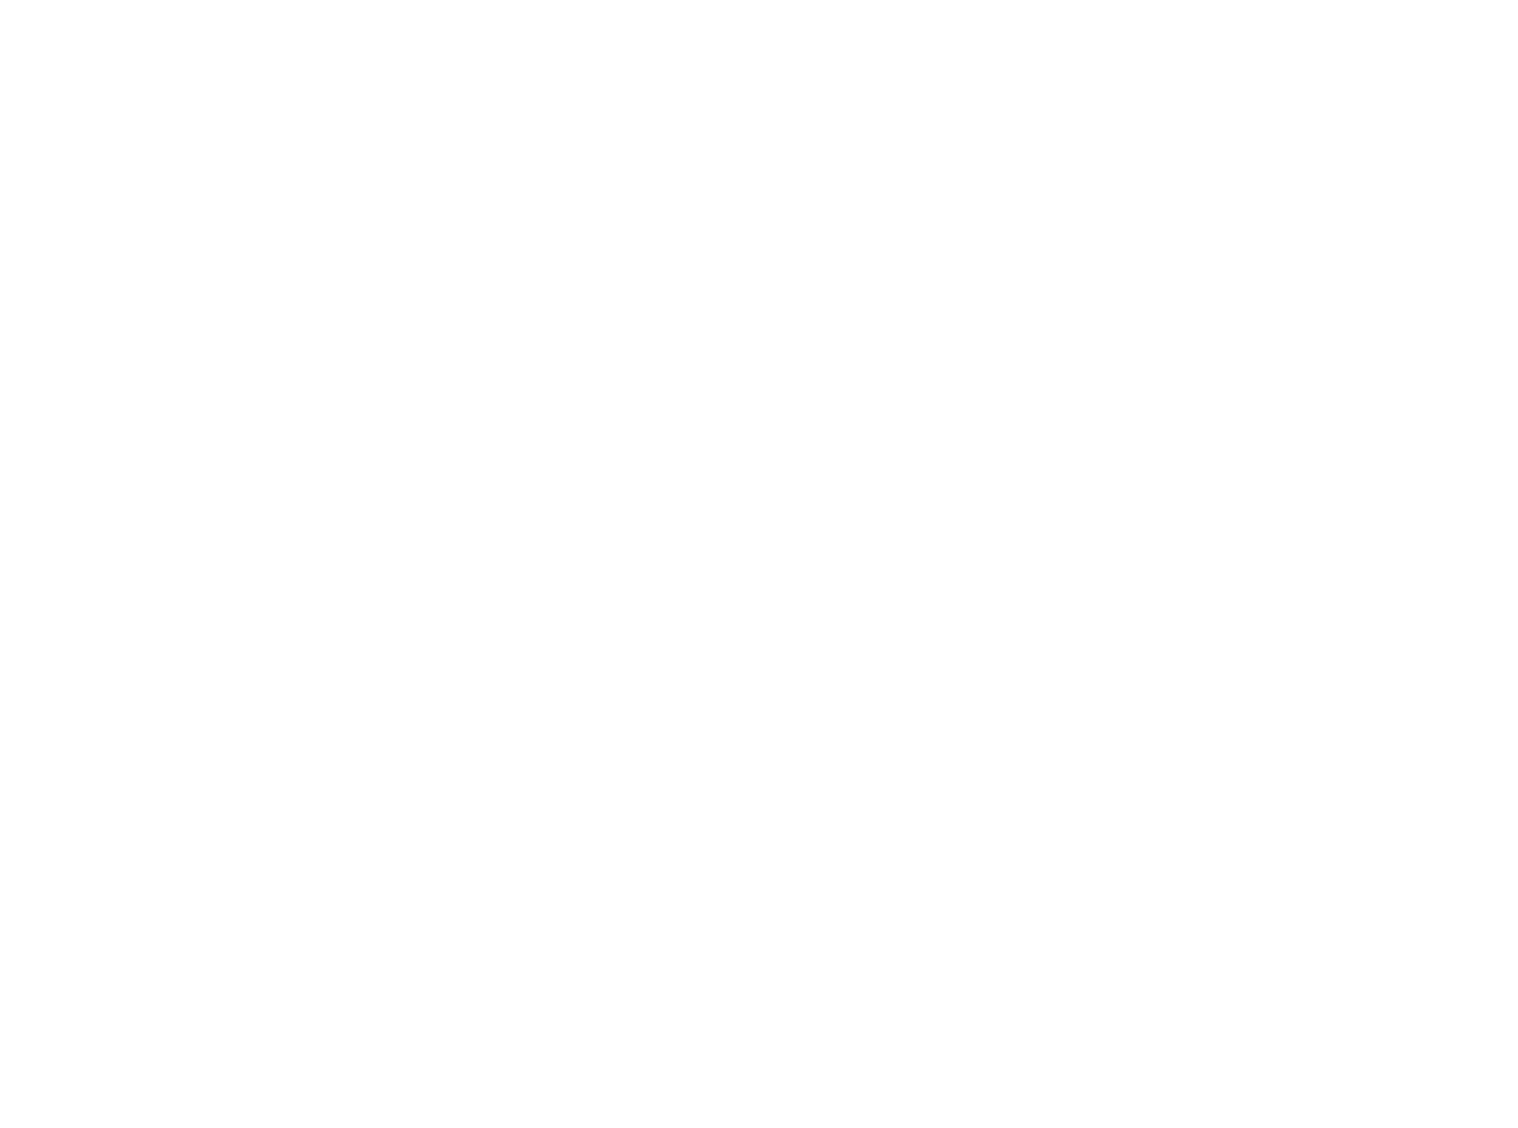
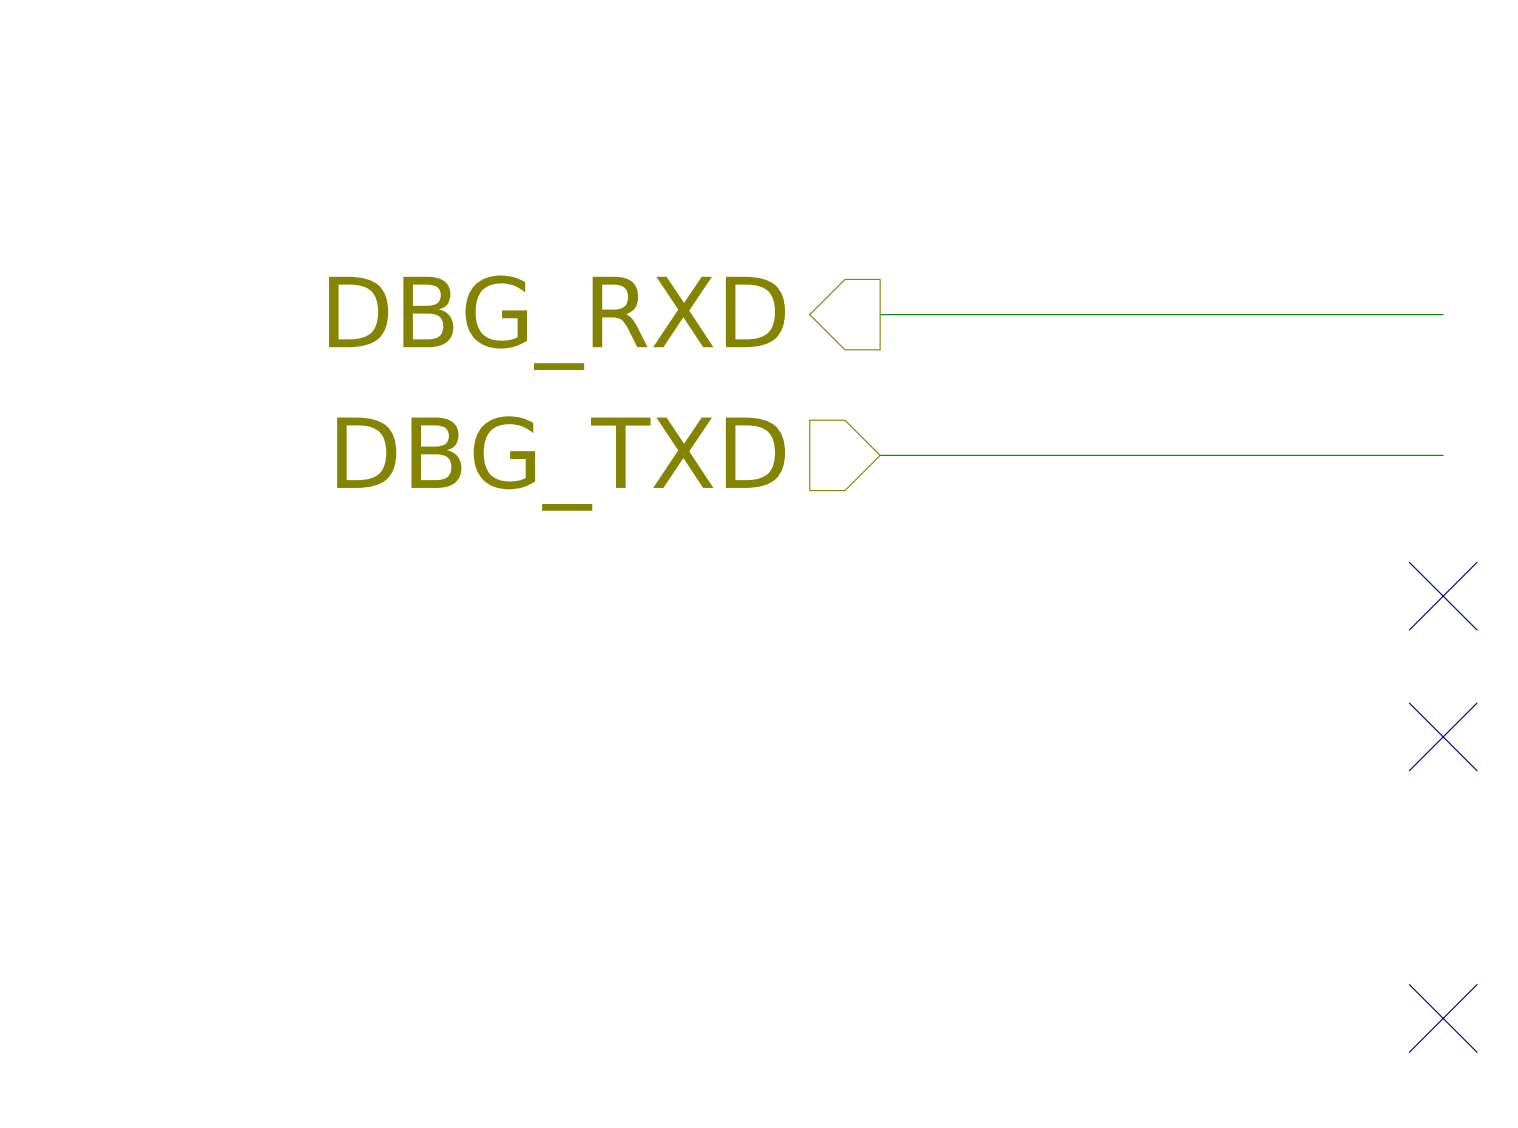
wire: none -> (880, 314) (1443, 314)
hierarchical label: none -> DBG_RXD (557, 322)
wire: none -> (880, 455) (1443, 455)
hierarchical label: none -> DBG_TXD (561, 463)
no-connect mark: none -> (1443, 596)
no-connect mark: none -> (1443, 736)
no-connect mark: none -> (1443, 1018)

